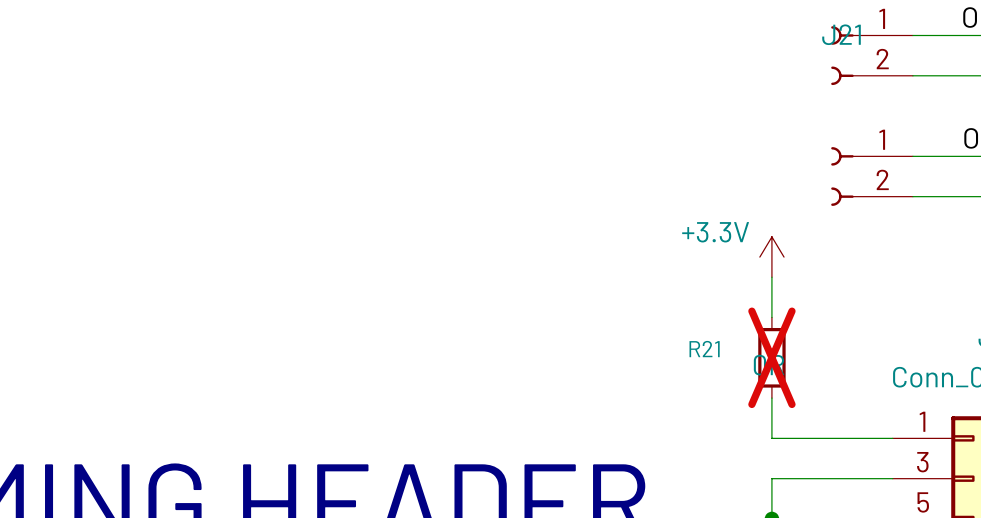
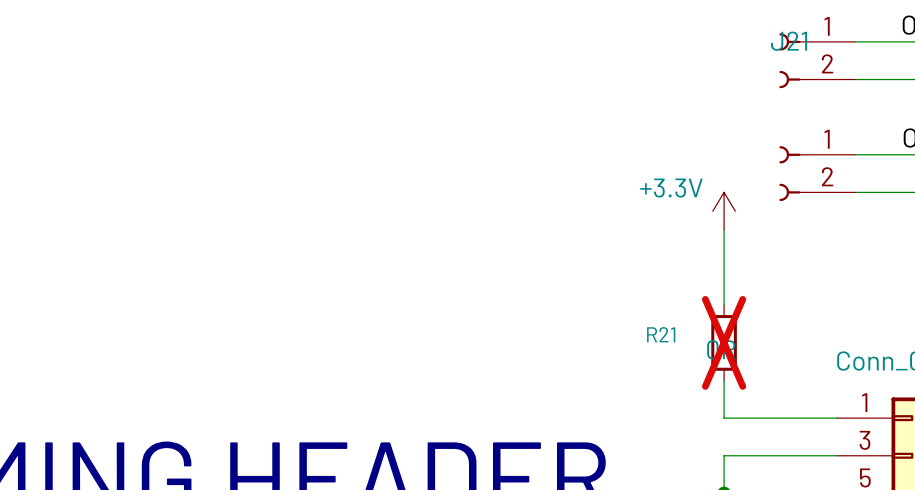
power symbol position: +3.3V (771, 257) -> +3.3V (724, 211)

